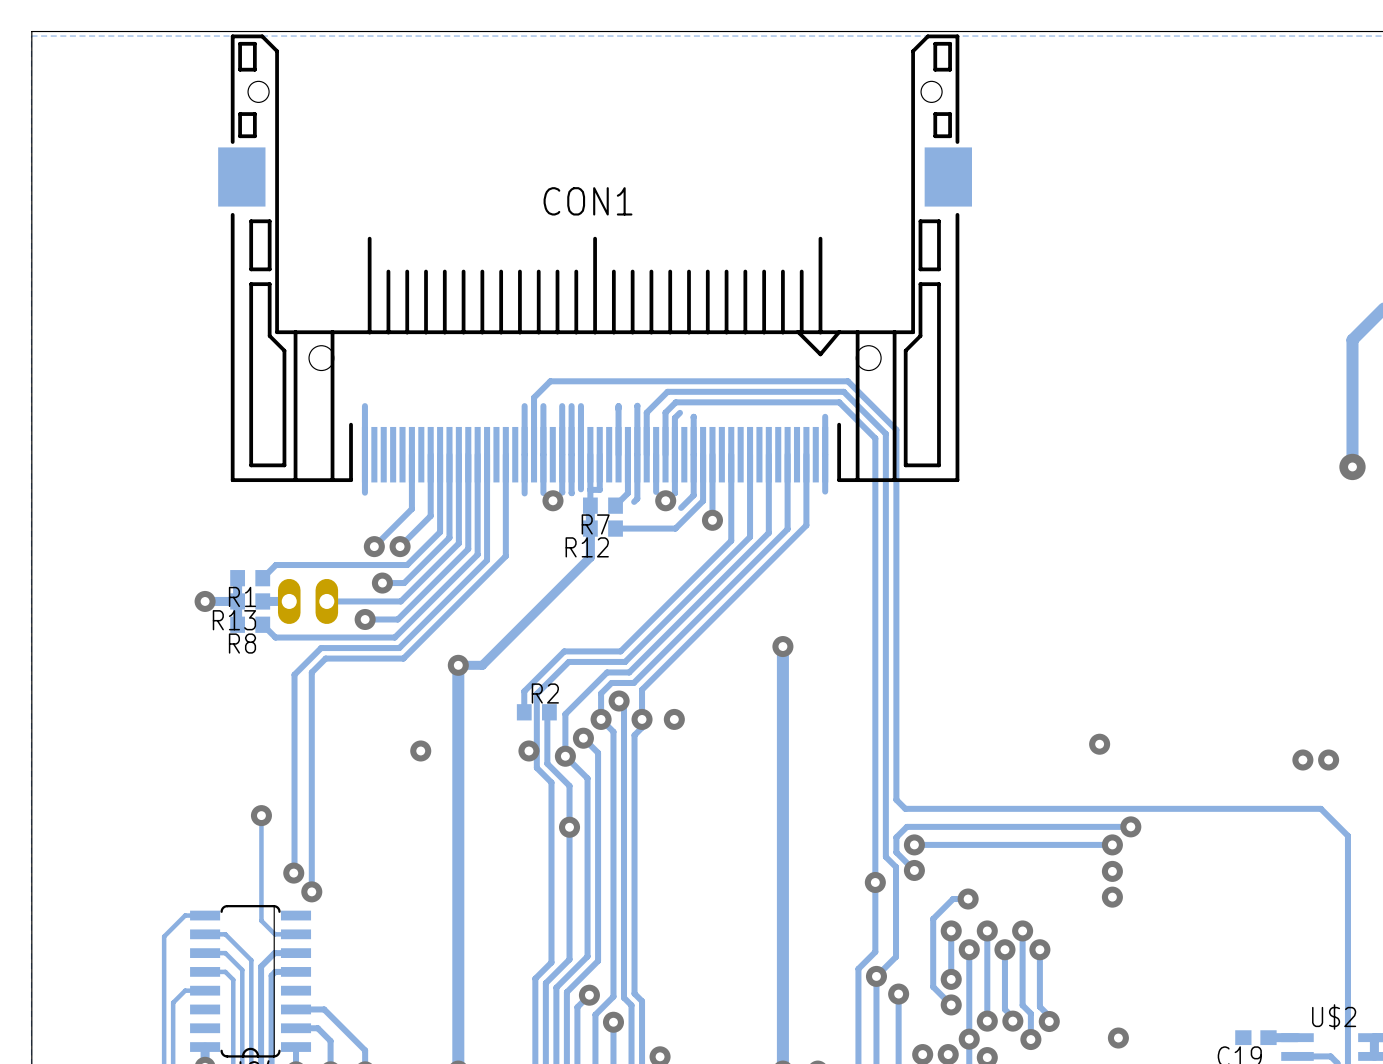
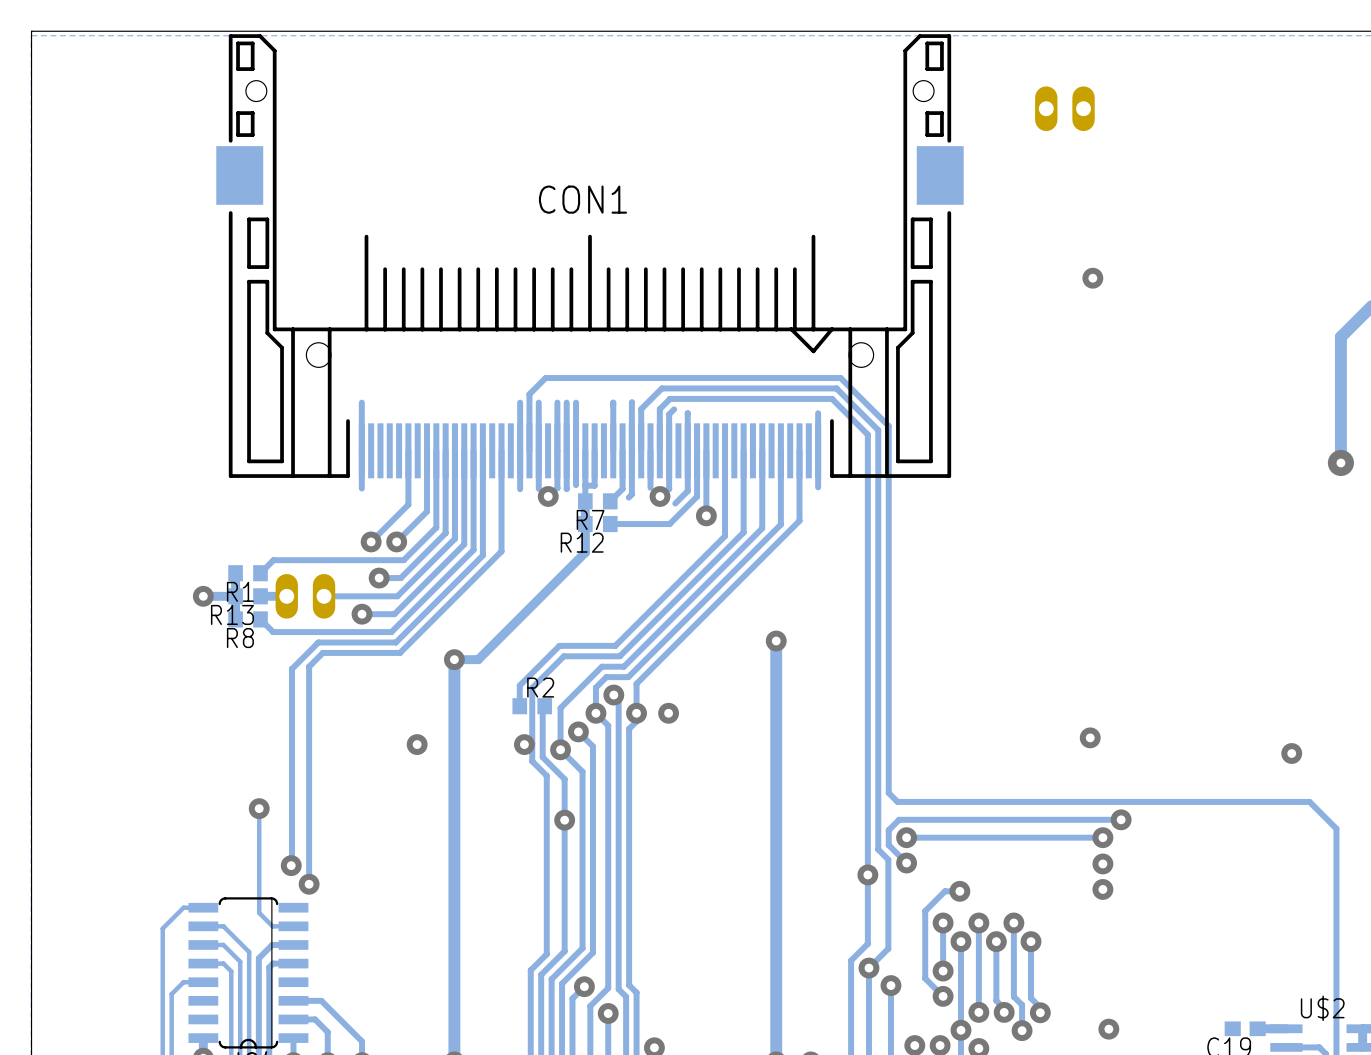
part: none -> (1064, 108)
via: none -> (1092, 278)
via: (1328, 760) -> none

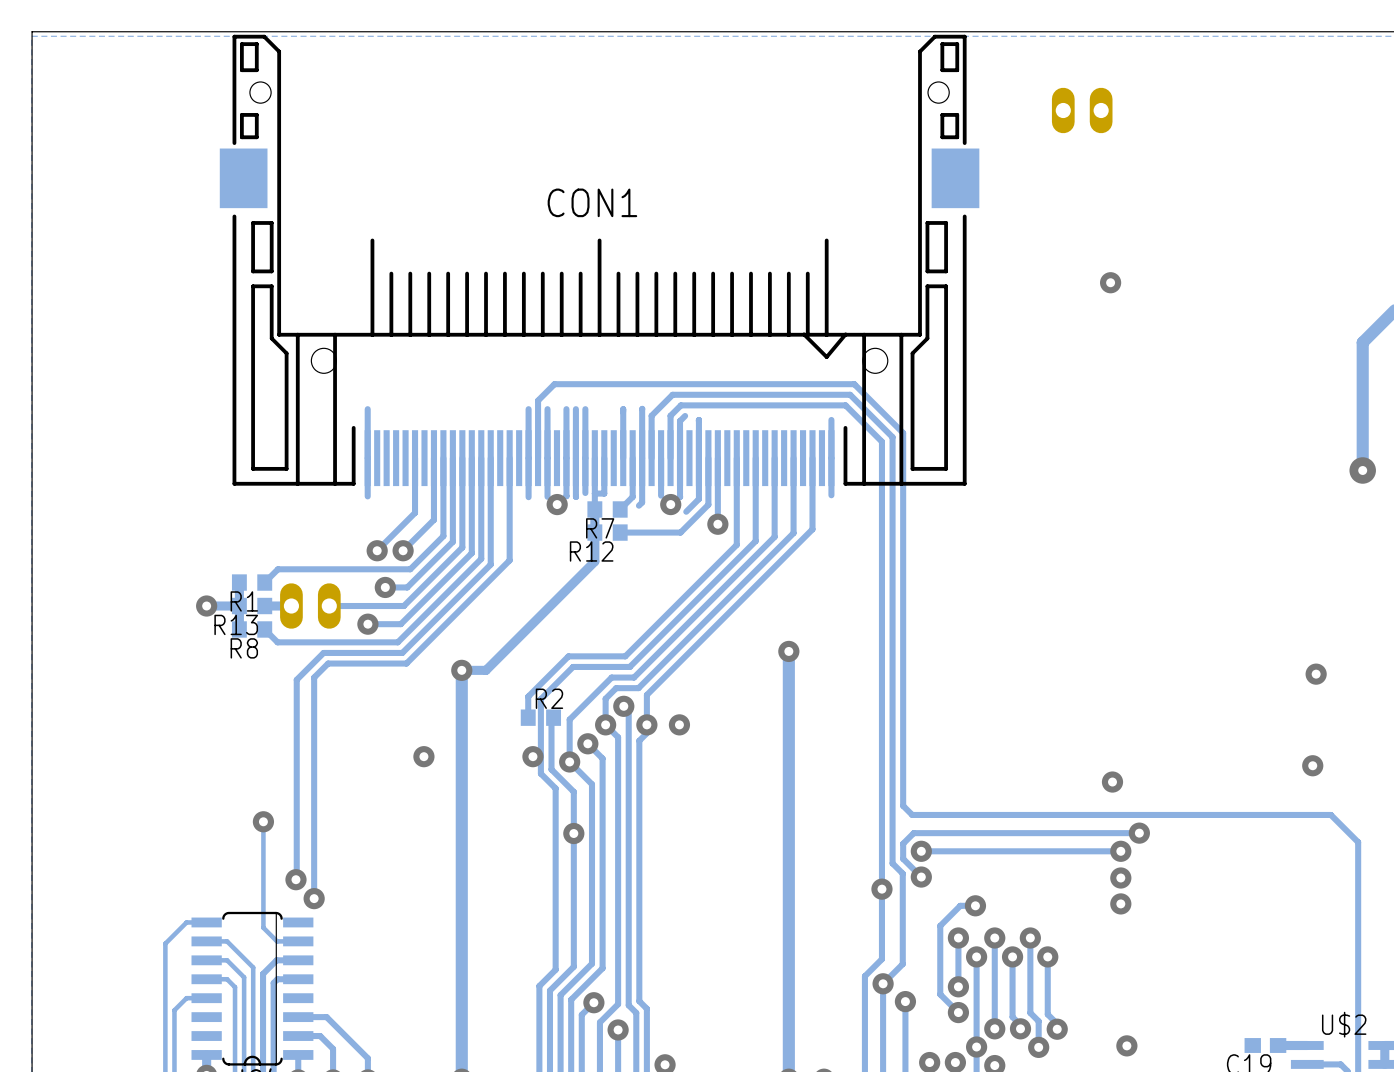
via: none -> (1316, 674)
via position: (1090, 737) -> (1112, 782)

